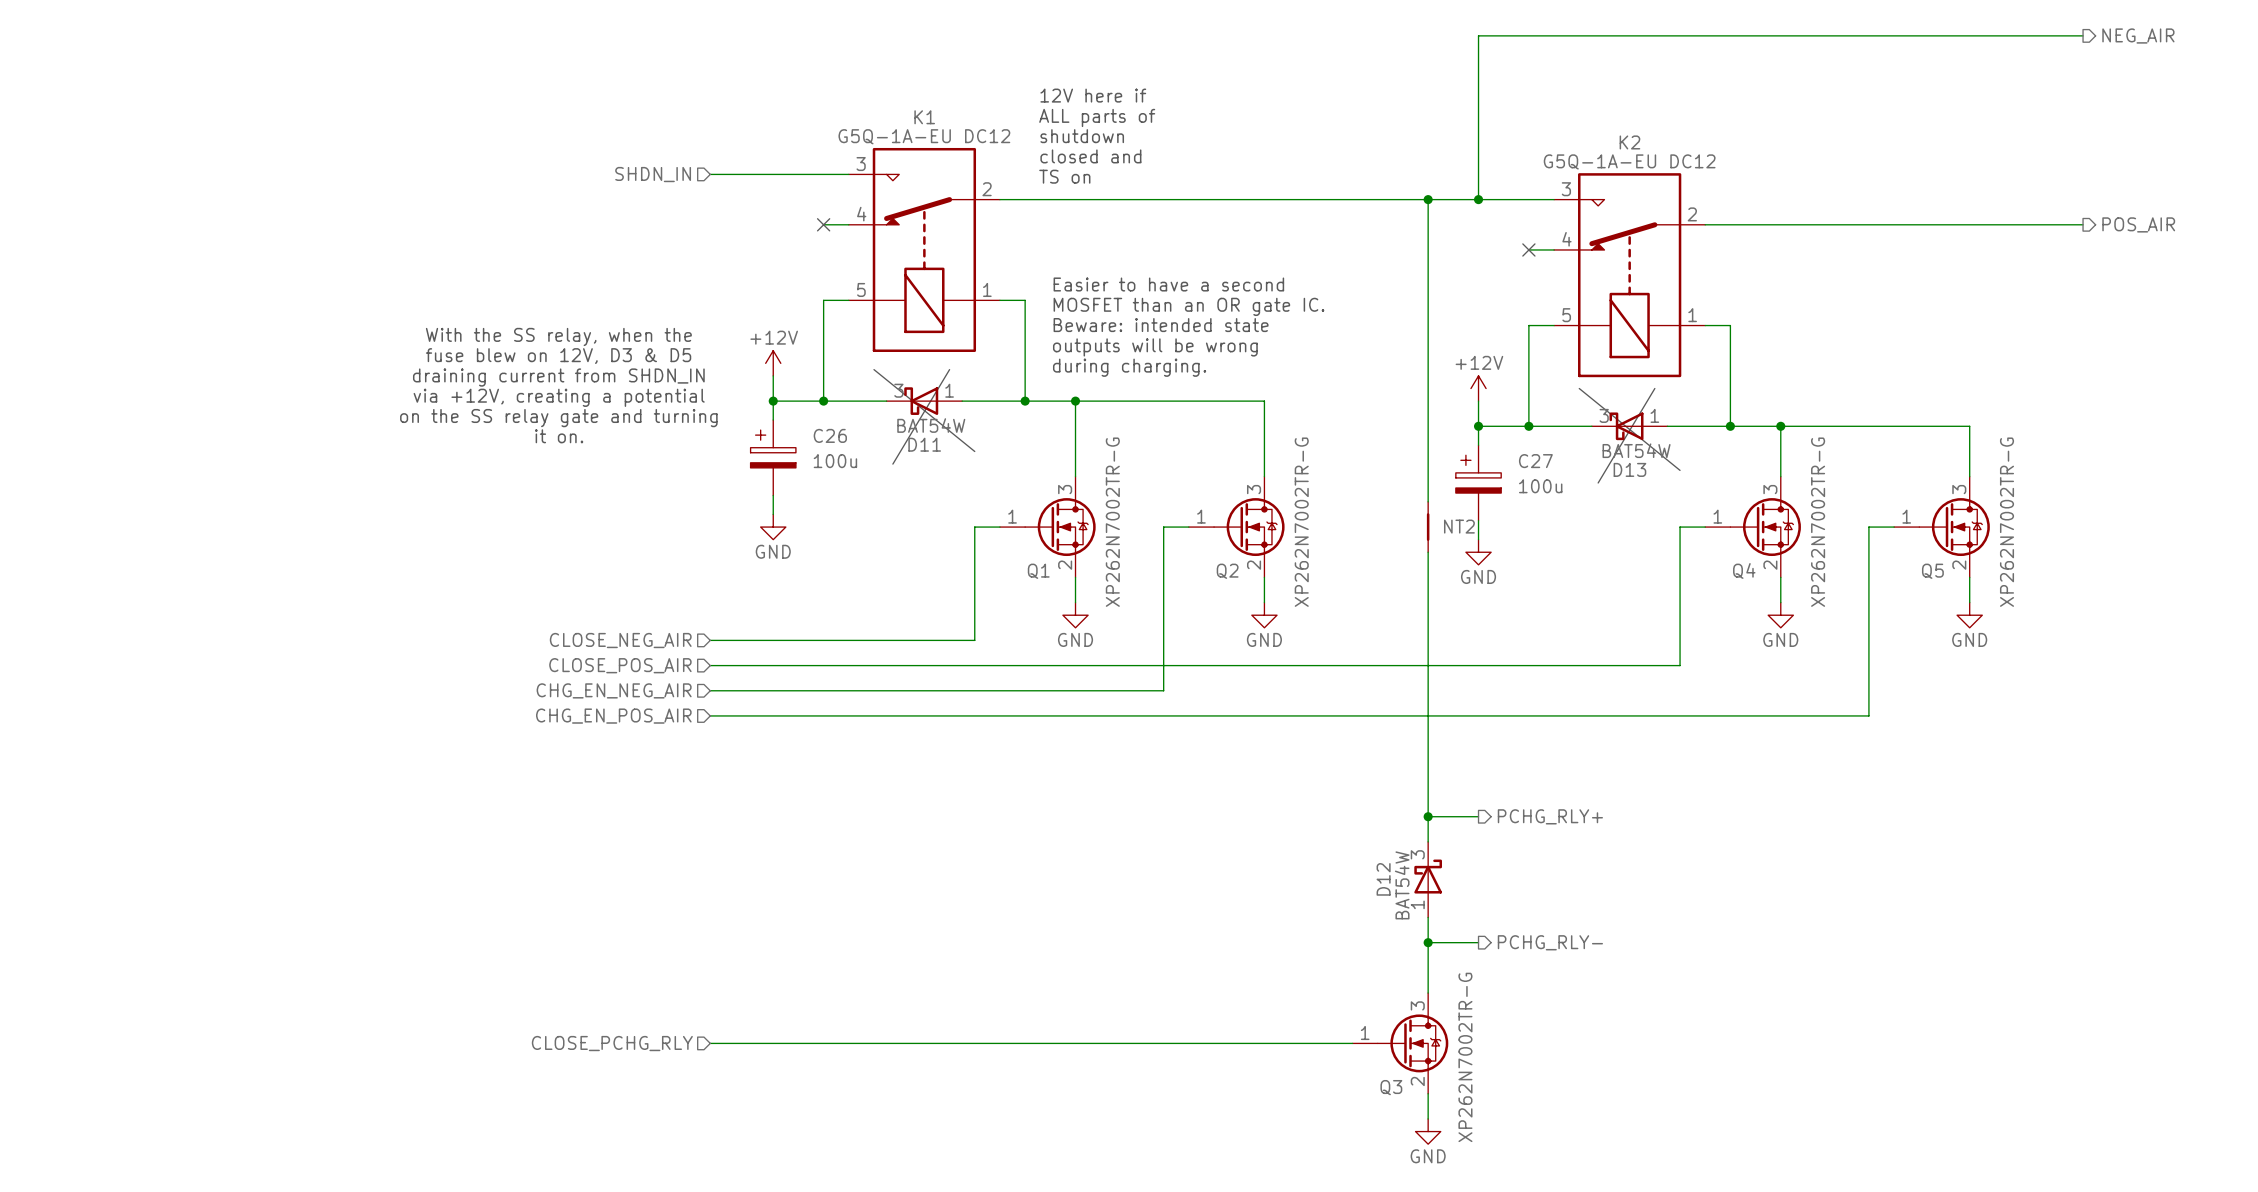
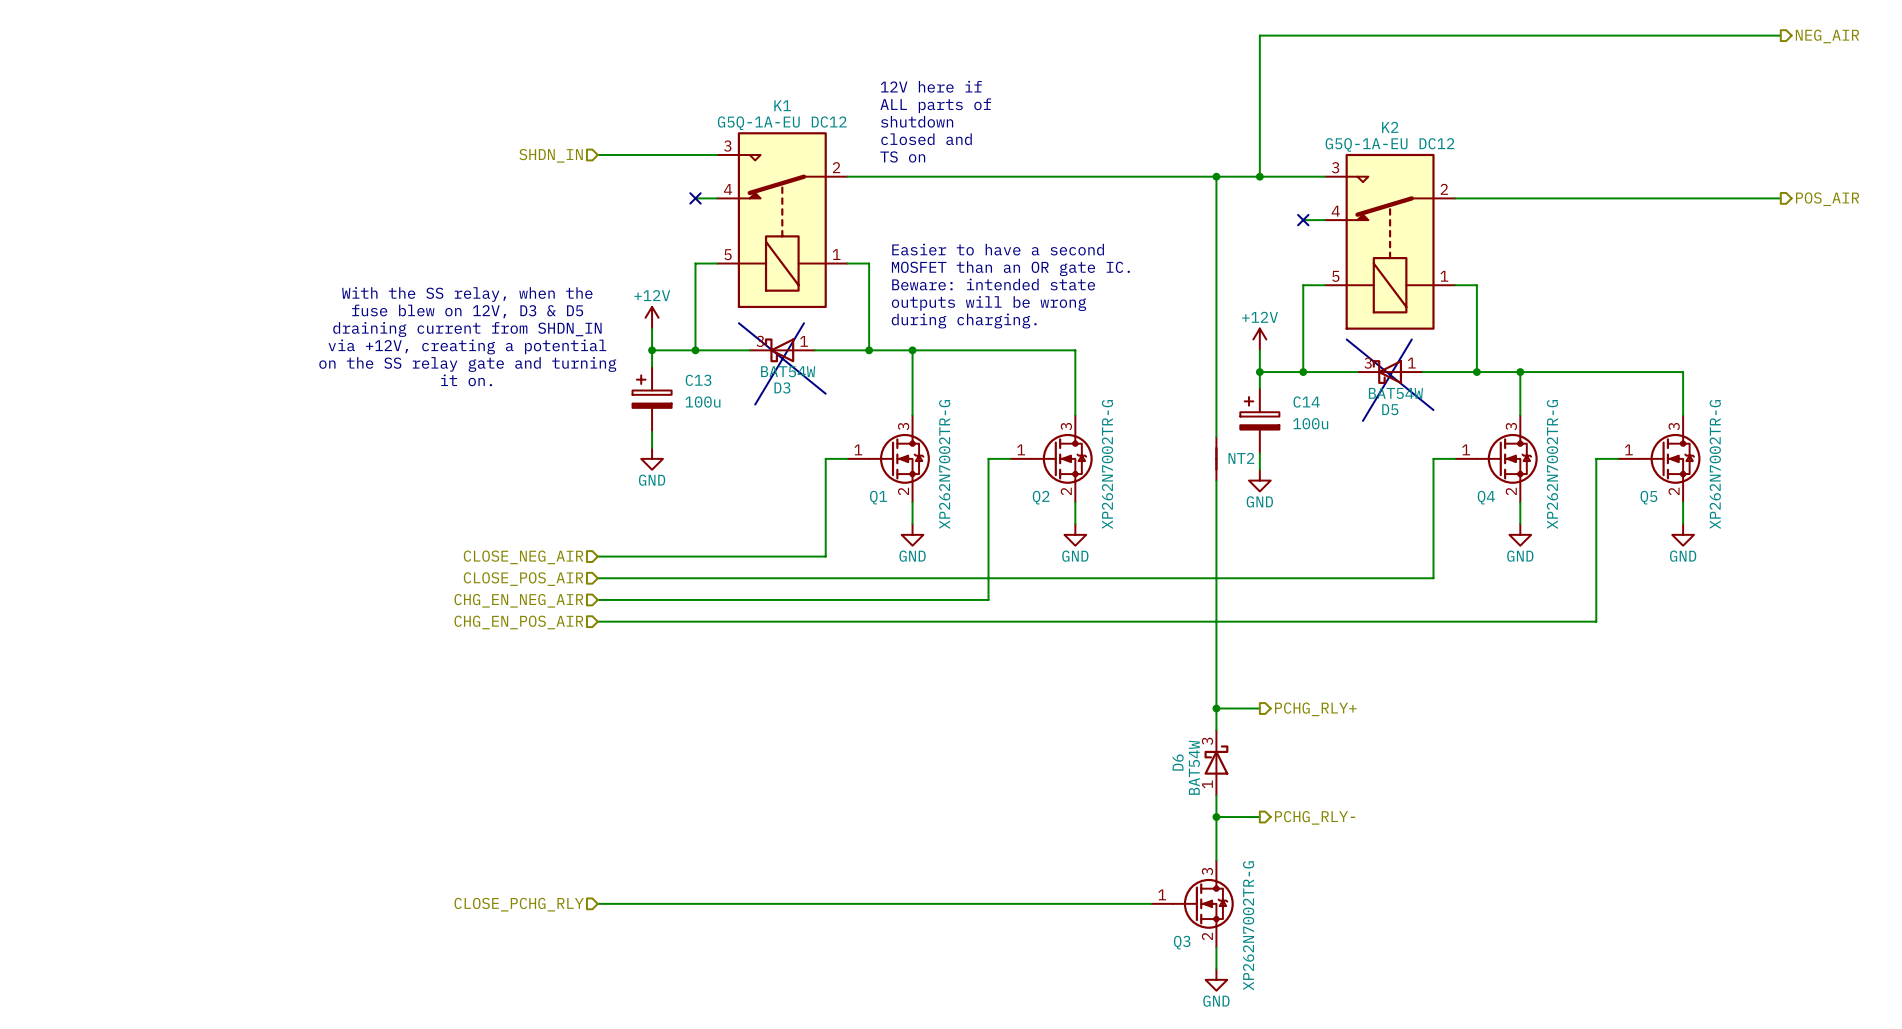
C26 name: C26 (830, 435) -> C13 (698, 380)
D11 name: D11 (924, 444) -> D3 (782, 387)
C27 name: C27 (1535, 461) -> C14 (1306, 402)
D13 name: D13 (1629, 469) -> D5 (1390, 409)
D12 name: D12 (1383, 879) -> D6 (1178, 762)

